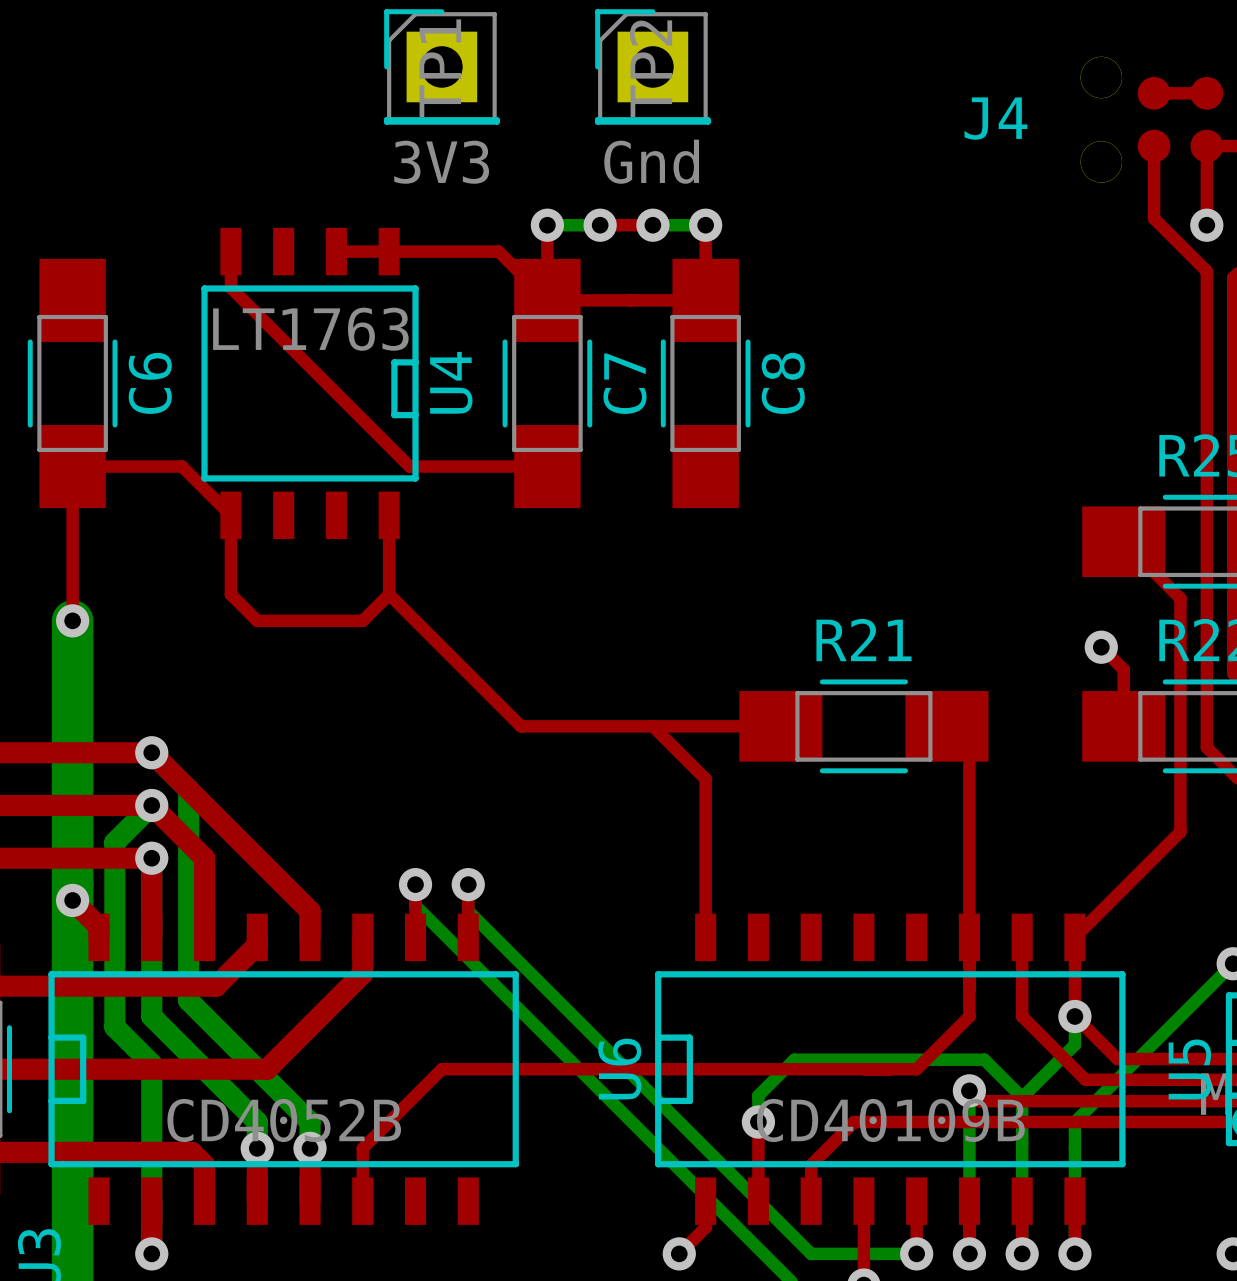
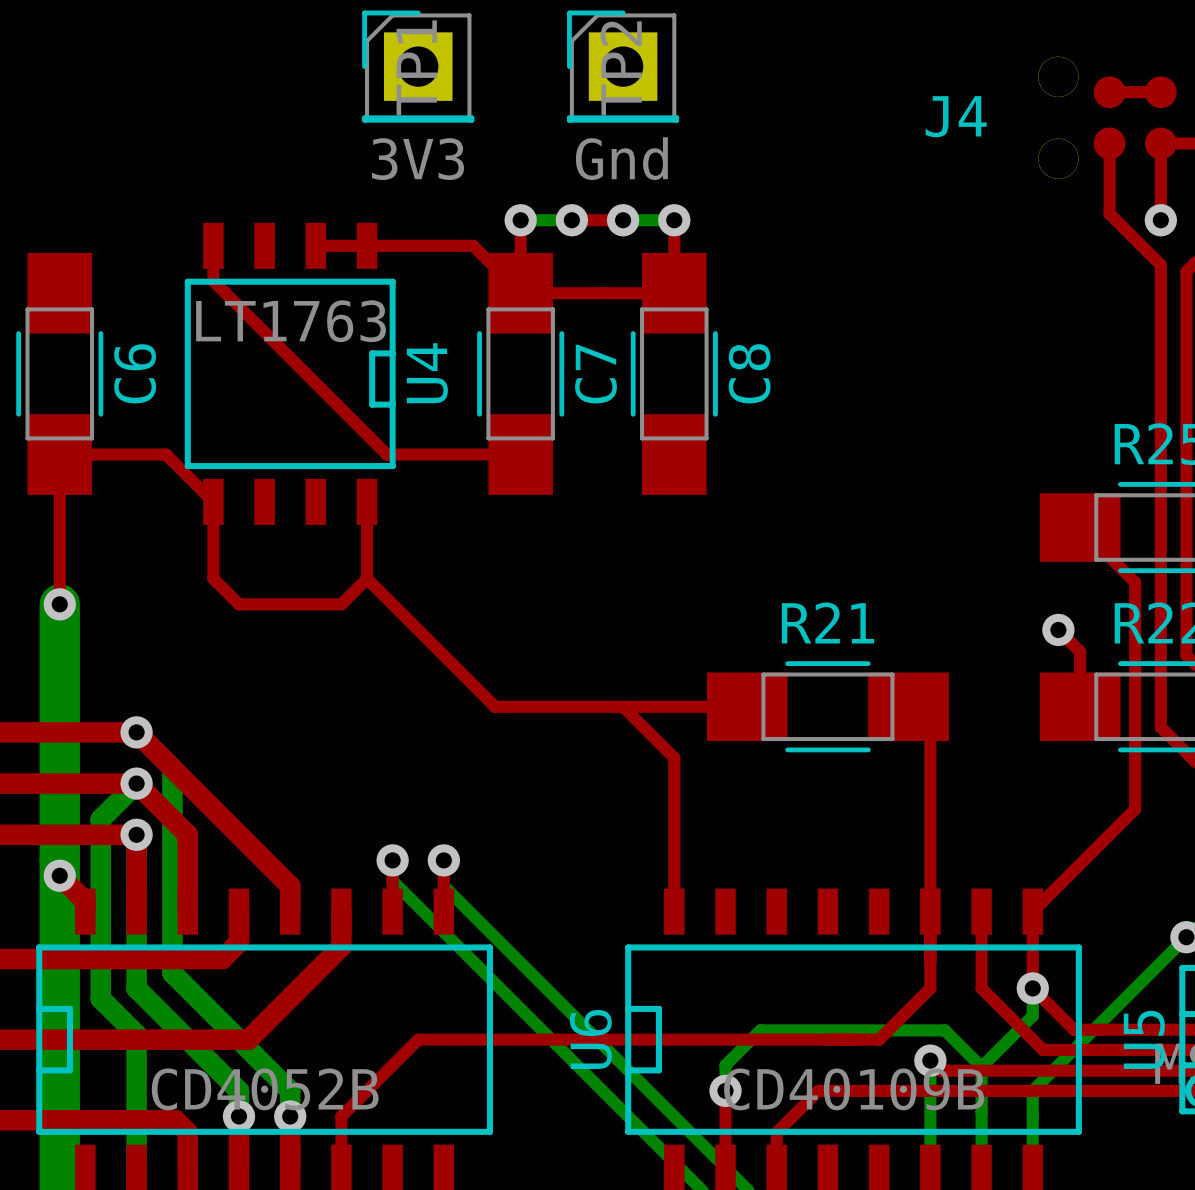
top track: (257, 945) (216, 986) -> (239, 919) (239, 942) (222, 959) (199, 959)

